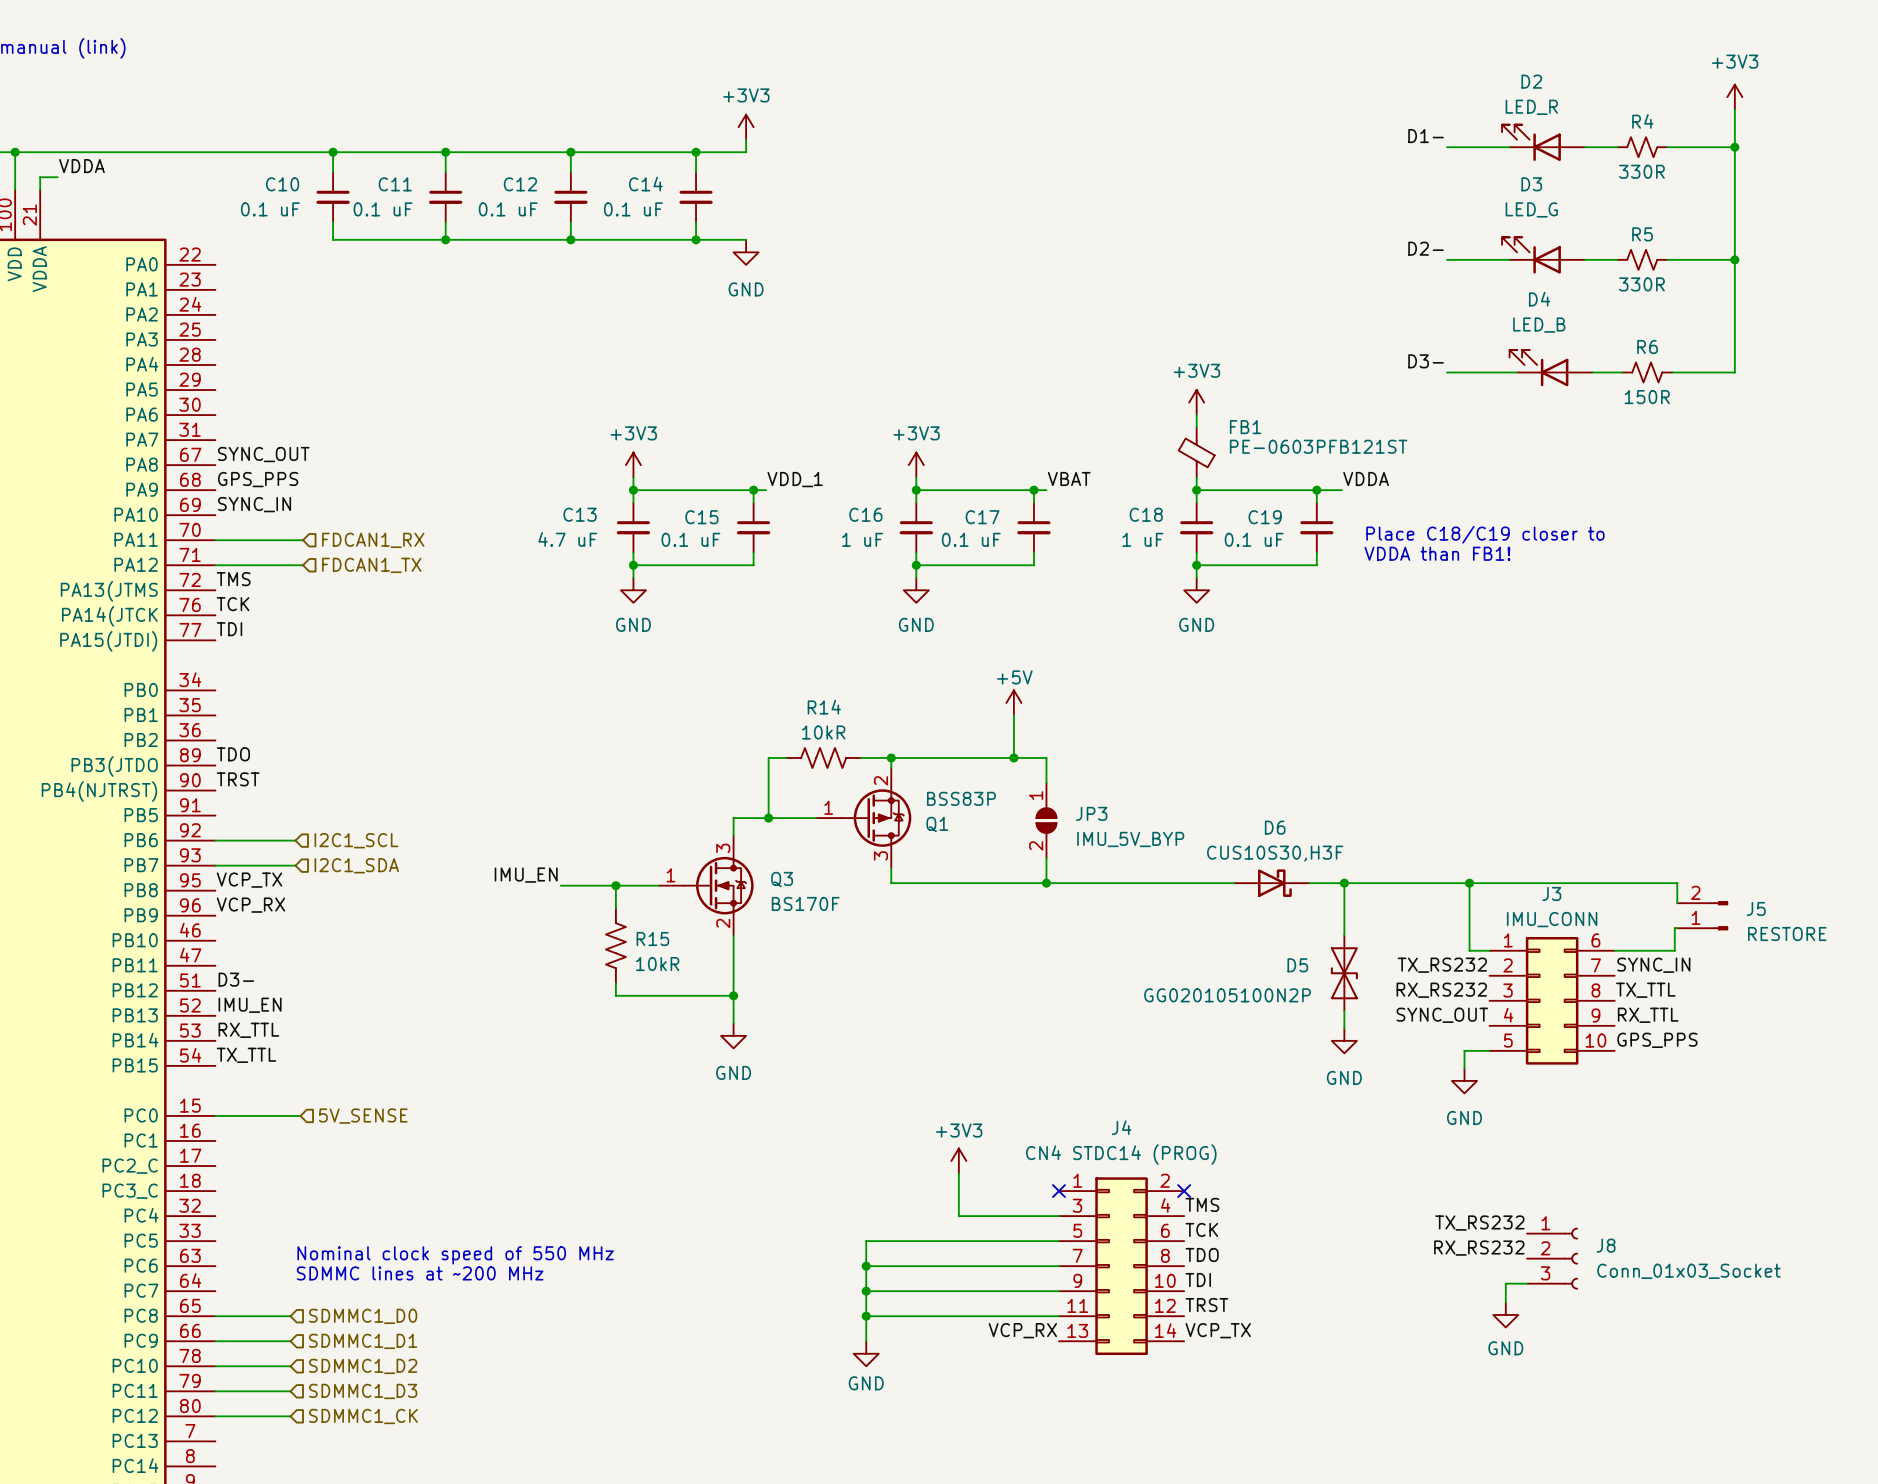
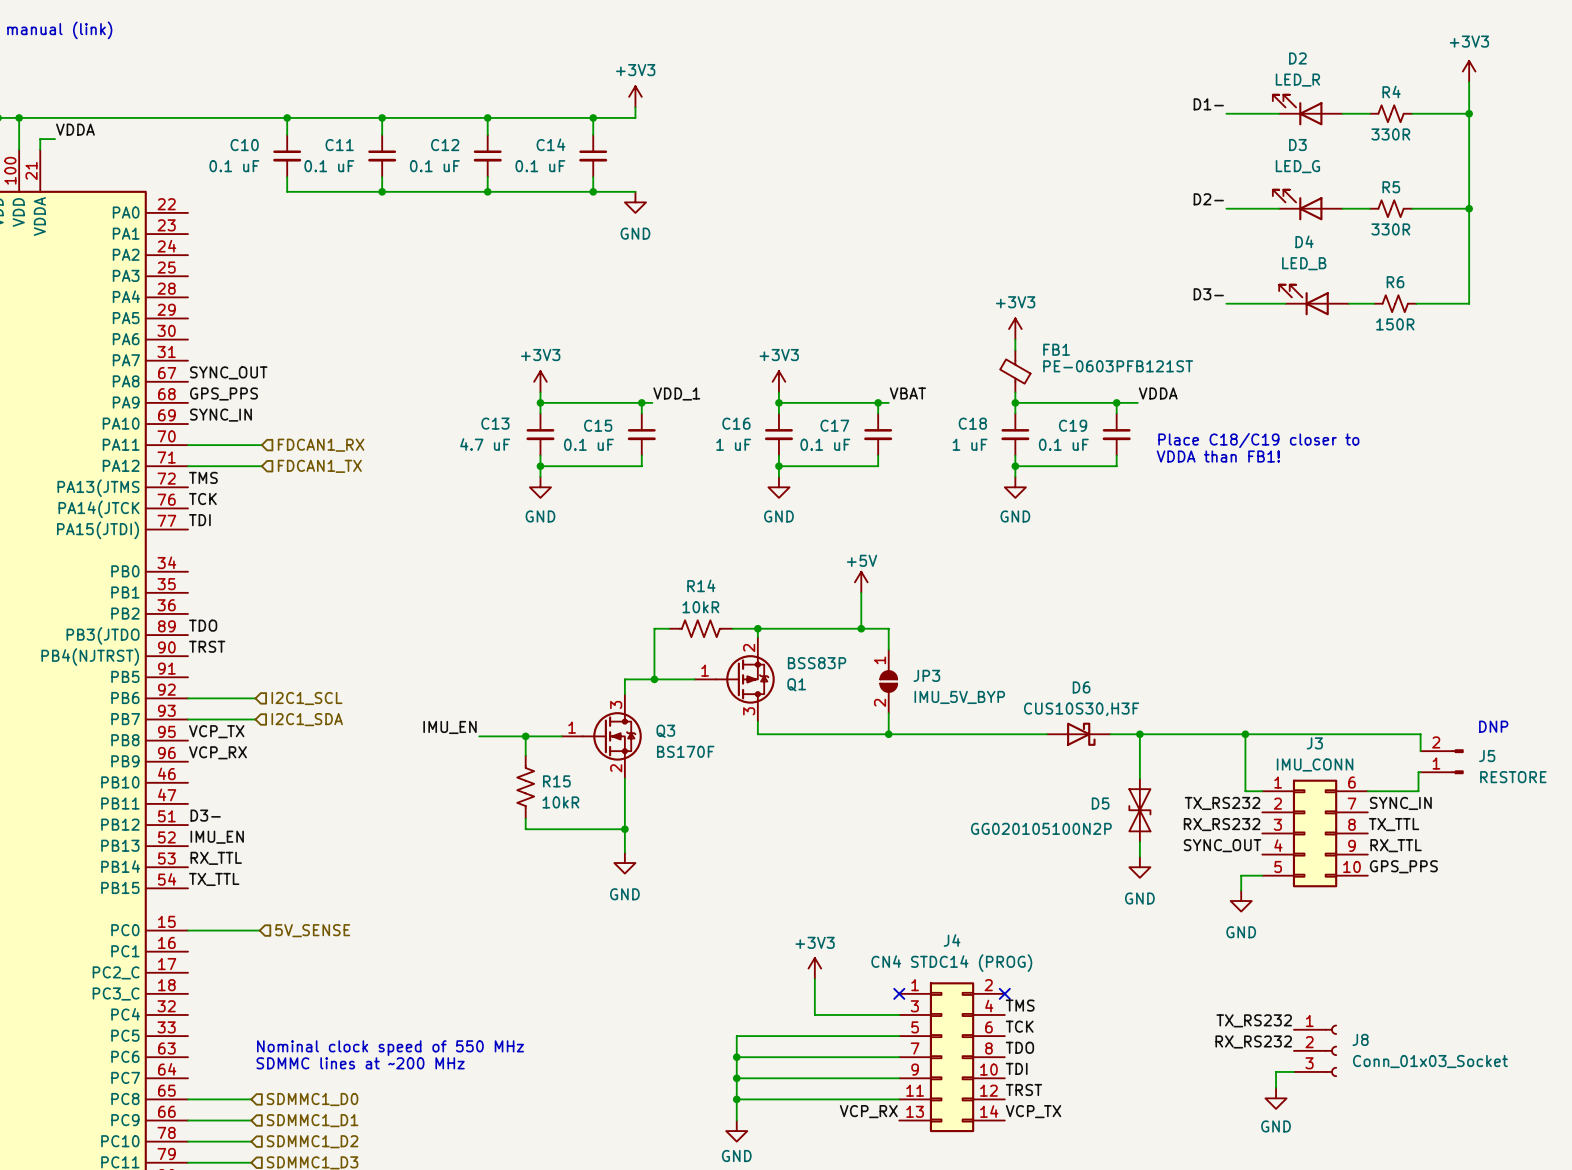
text: none -> DNP (1493, 726)

